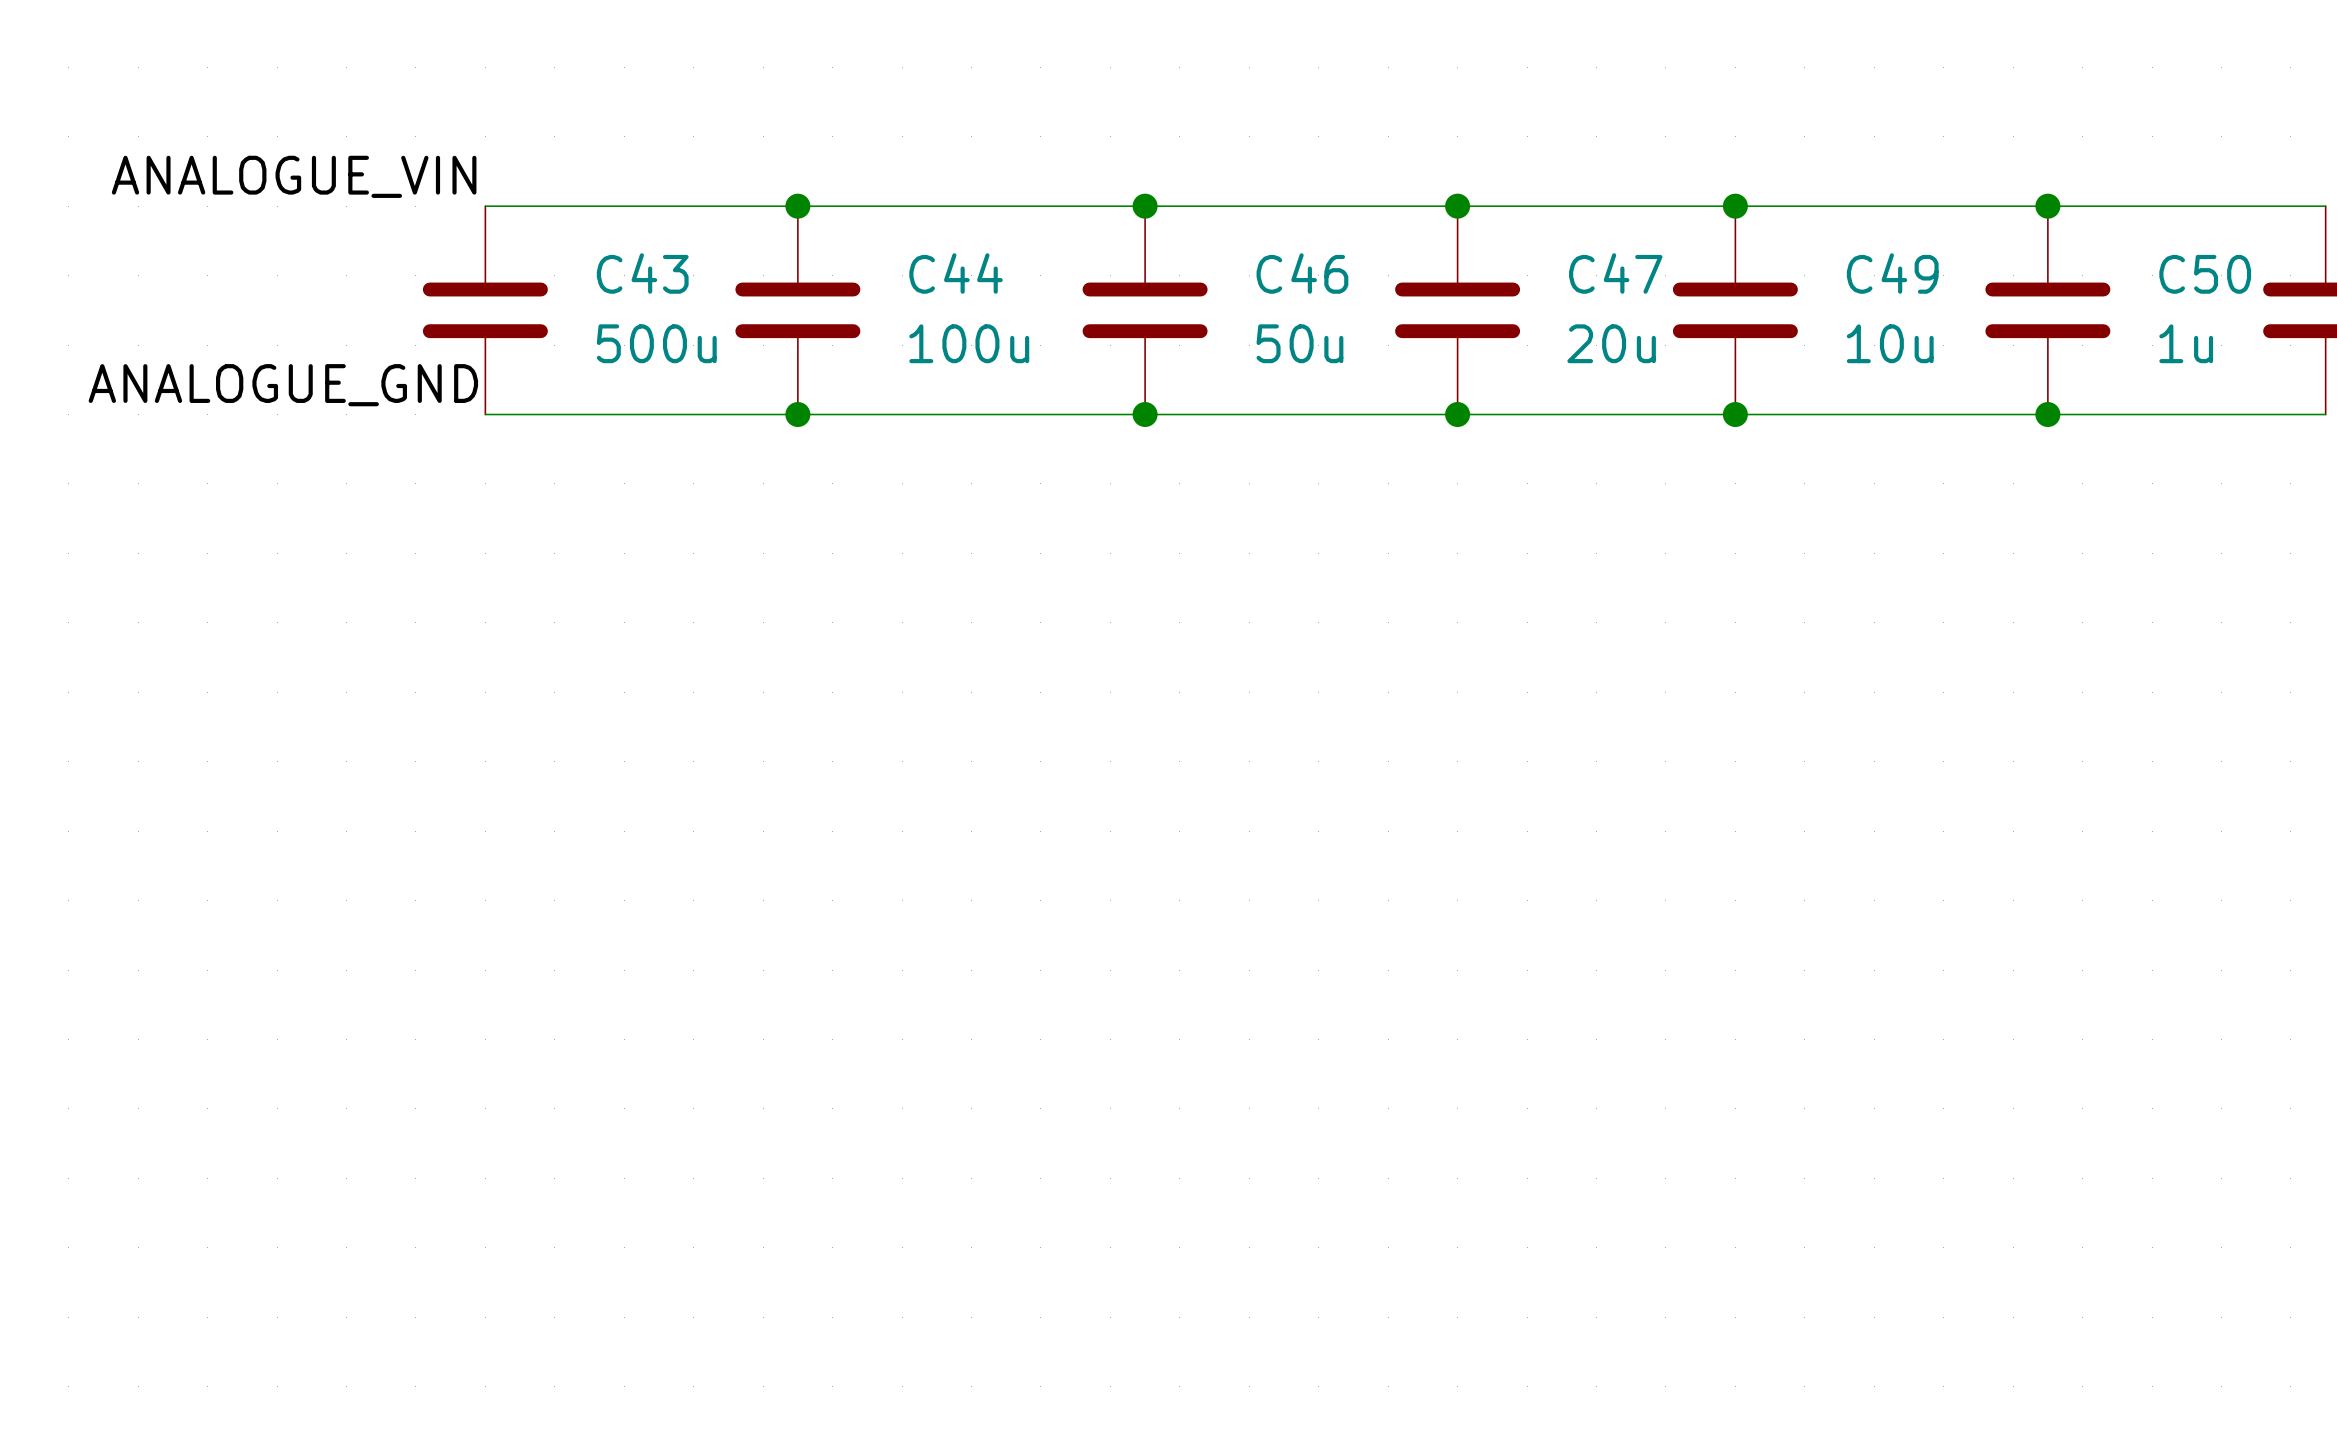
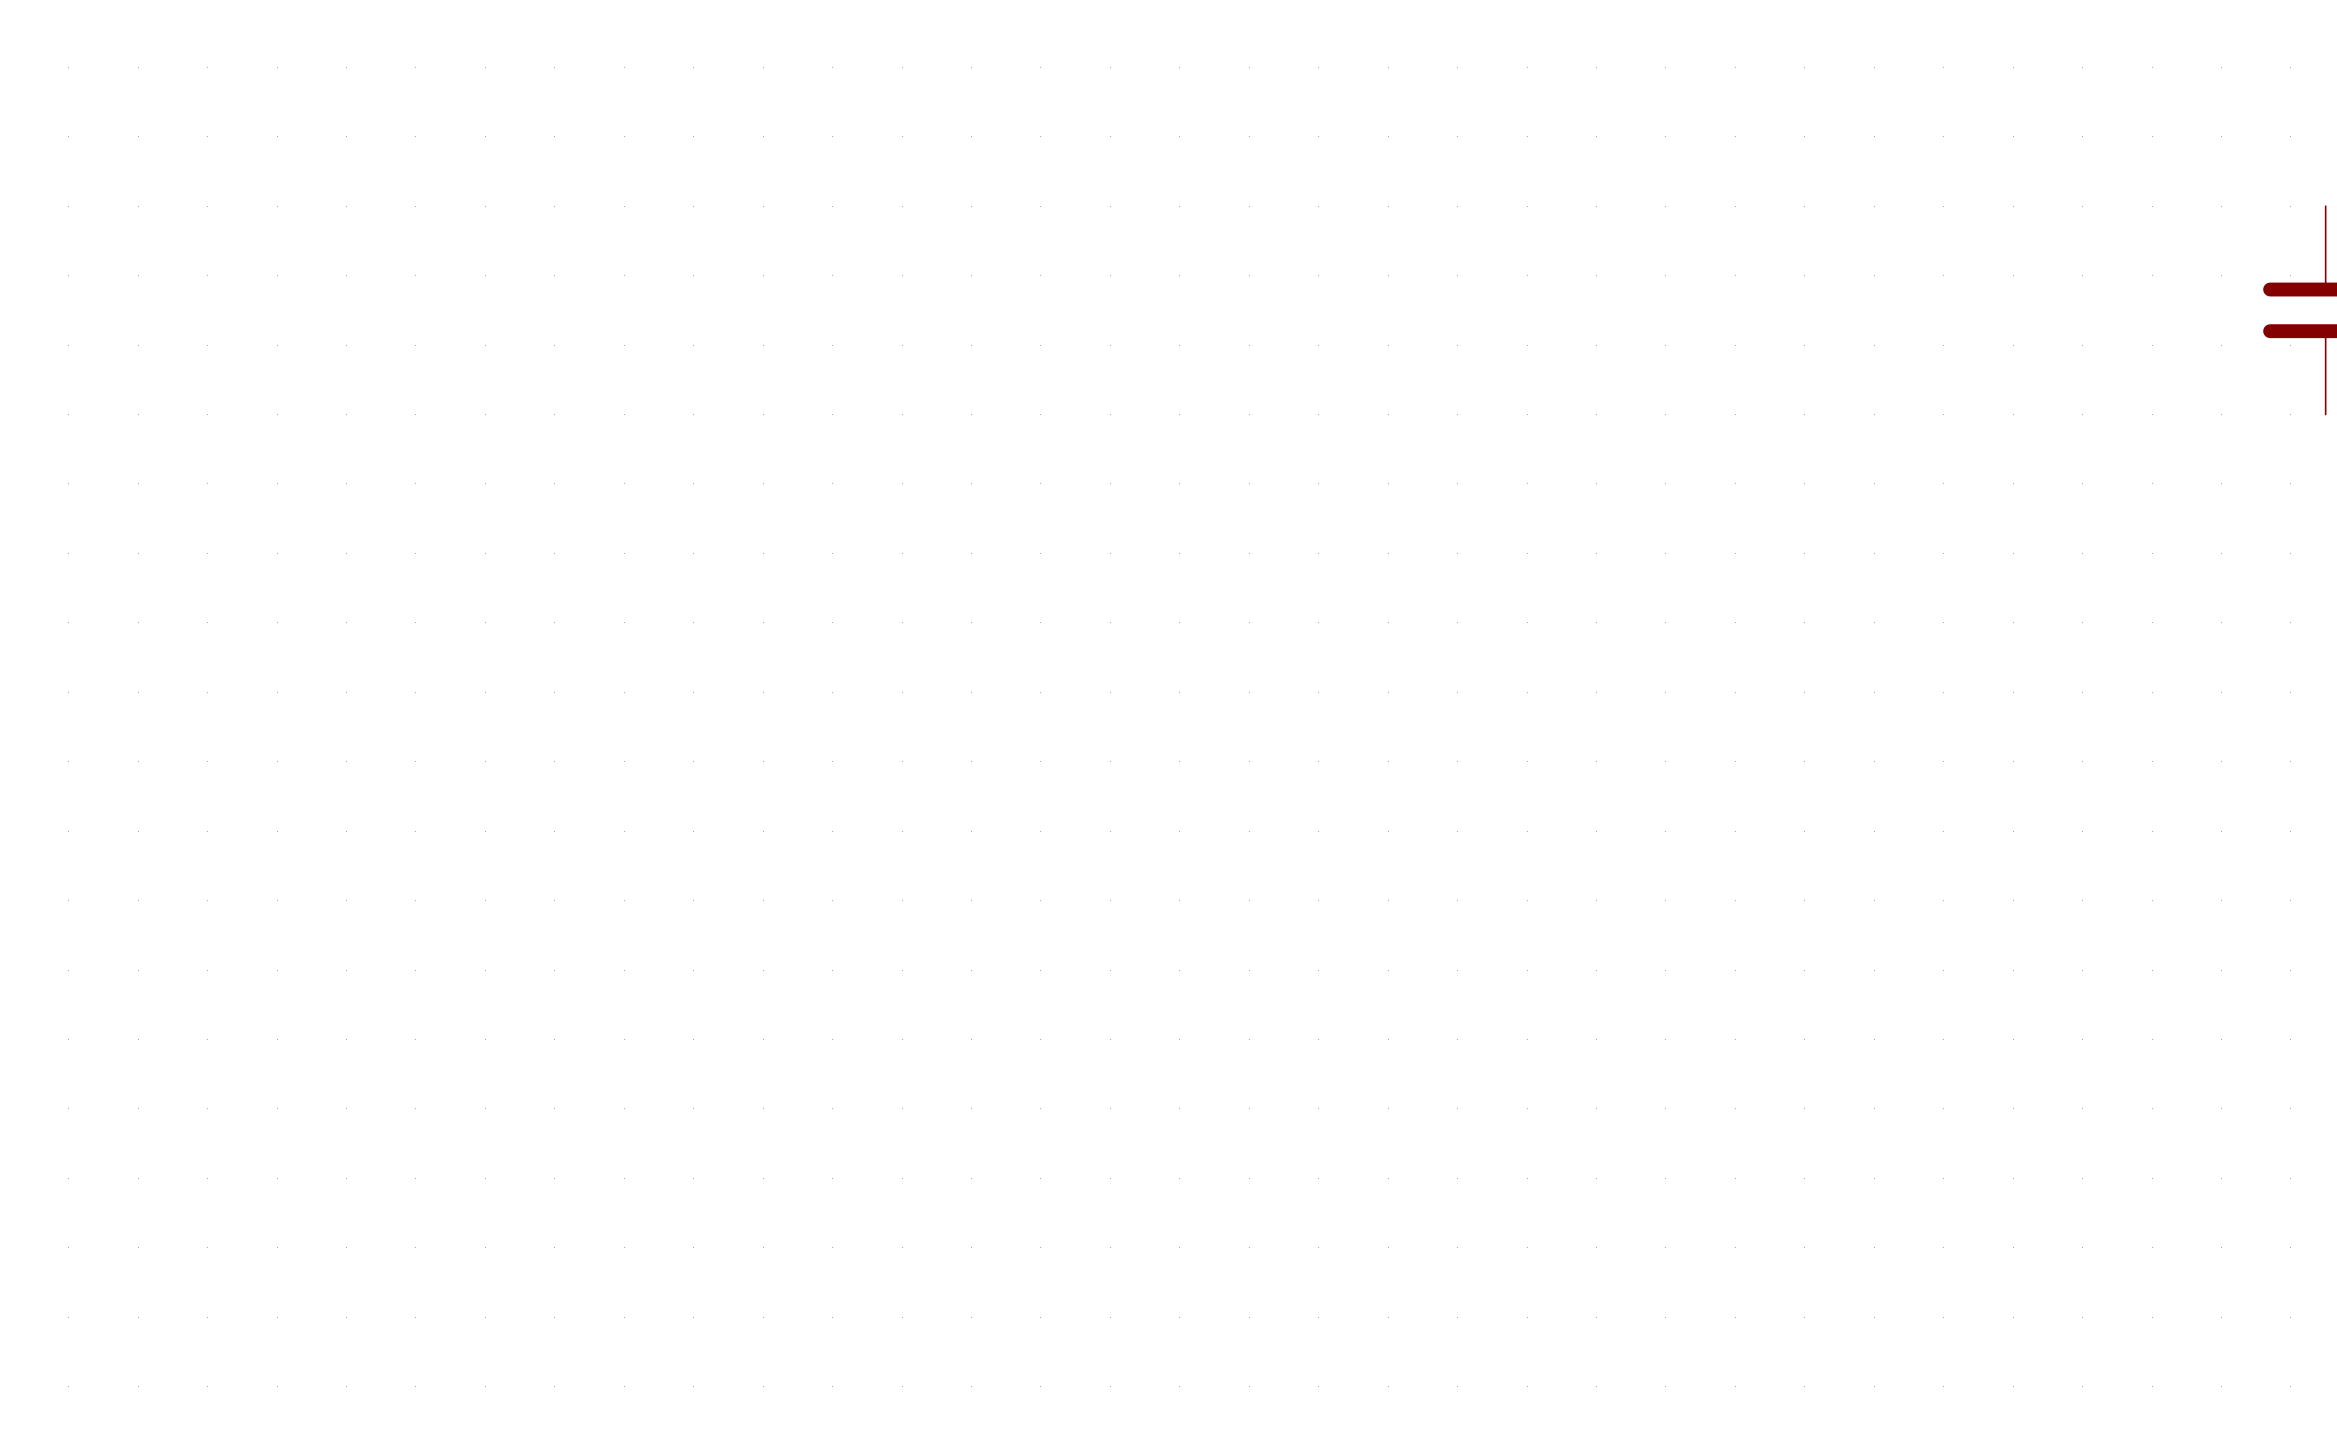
label: ANALOGUE_VIN (294, 176) -> none
wire: (485, 206) (2325, 206) -> none
junction: (797, 206) -> none
junction: (1145, 206) -> none
junction: (1457, 206) -> none
junction: (1735, 206) -> none
junction: (2047, 206) -> none
C43: 500u (485, 310) -> none
C44: 100u (797, 310) -> none
C46: 50u (1145, 310) -> none
C47: 20u (1457, 310) -> none
C49: 10u (1735, 310) -> none
C50: 1u (2047, 310) -> none
label: ANALOGUE_GND (283, 385) -> none
wire: (485, 414) (2325, 414) -> none
junction: (797, 414) -> none
junction: (1145, 414) -> none
junction: (1457, 414) -> none
junction: (1735, 414) -> none
junction: (2047, 414) -> none

